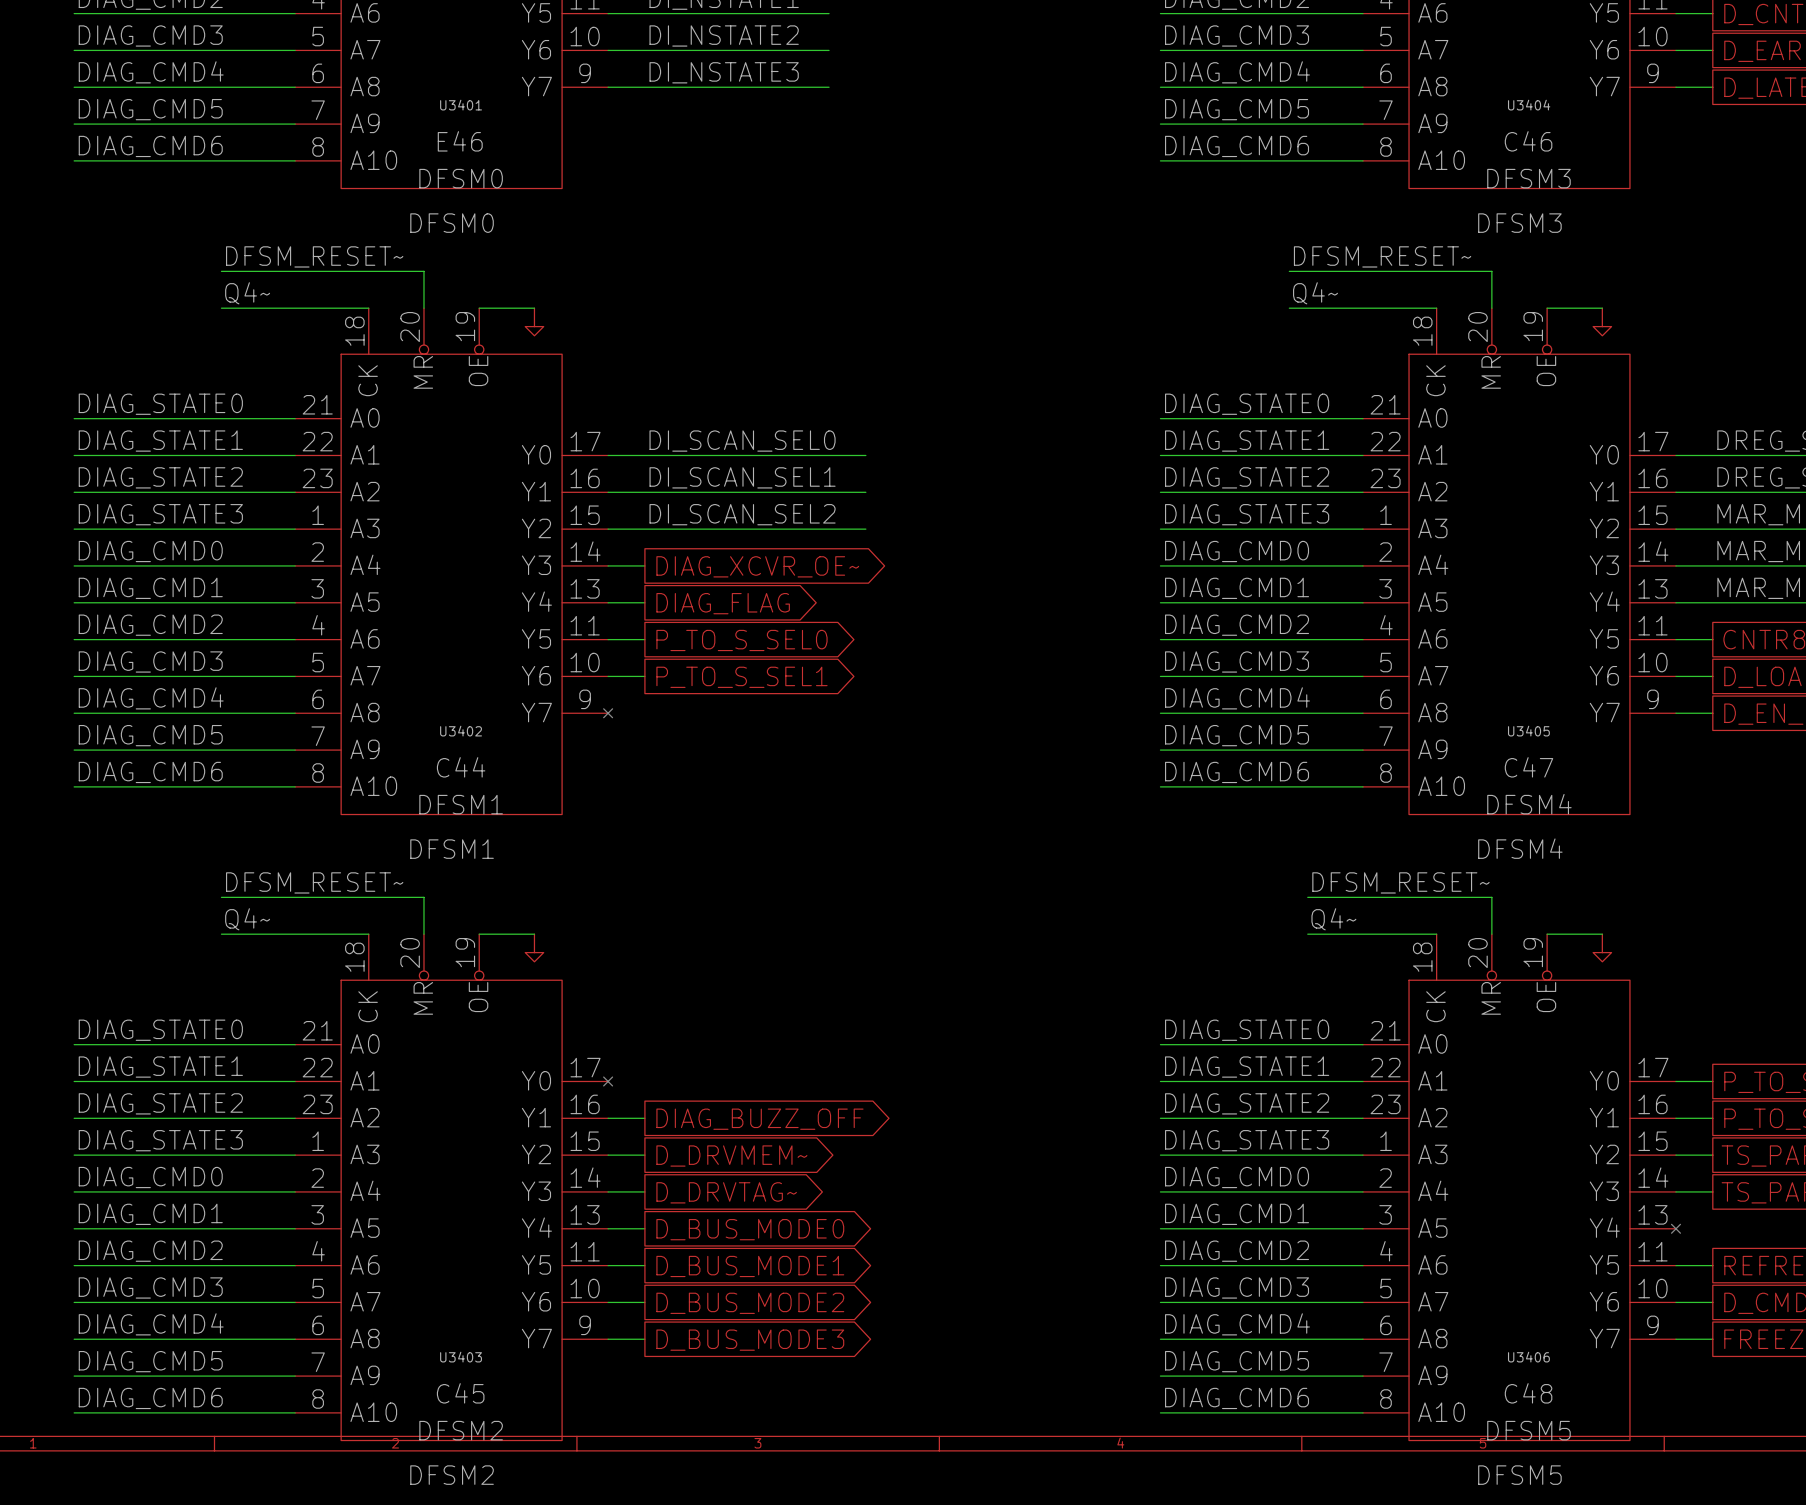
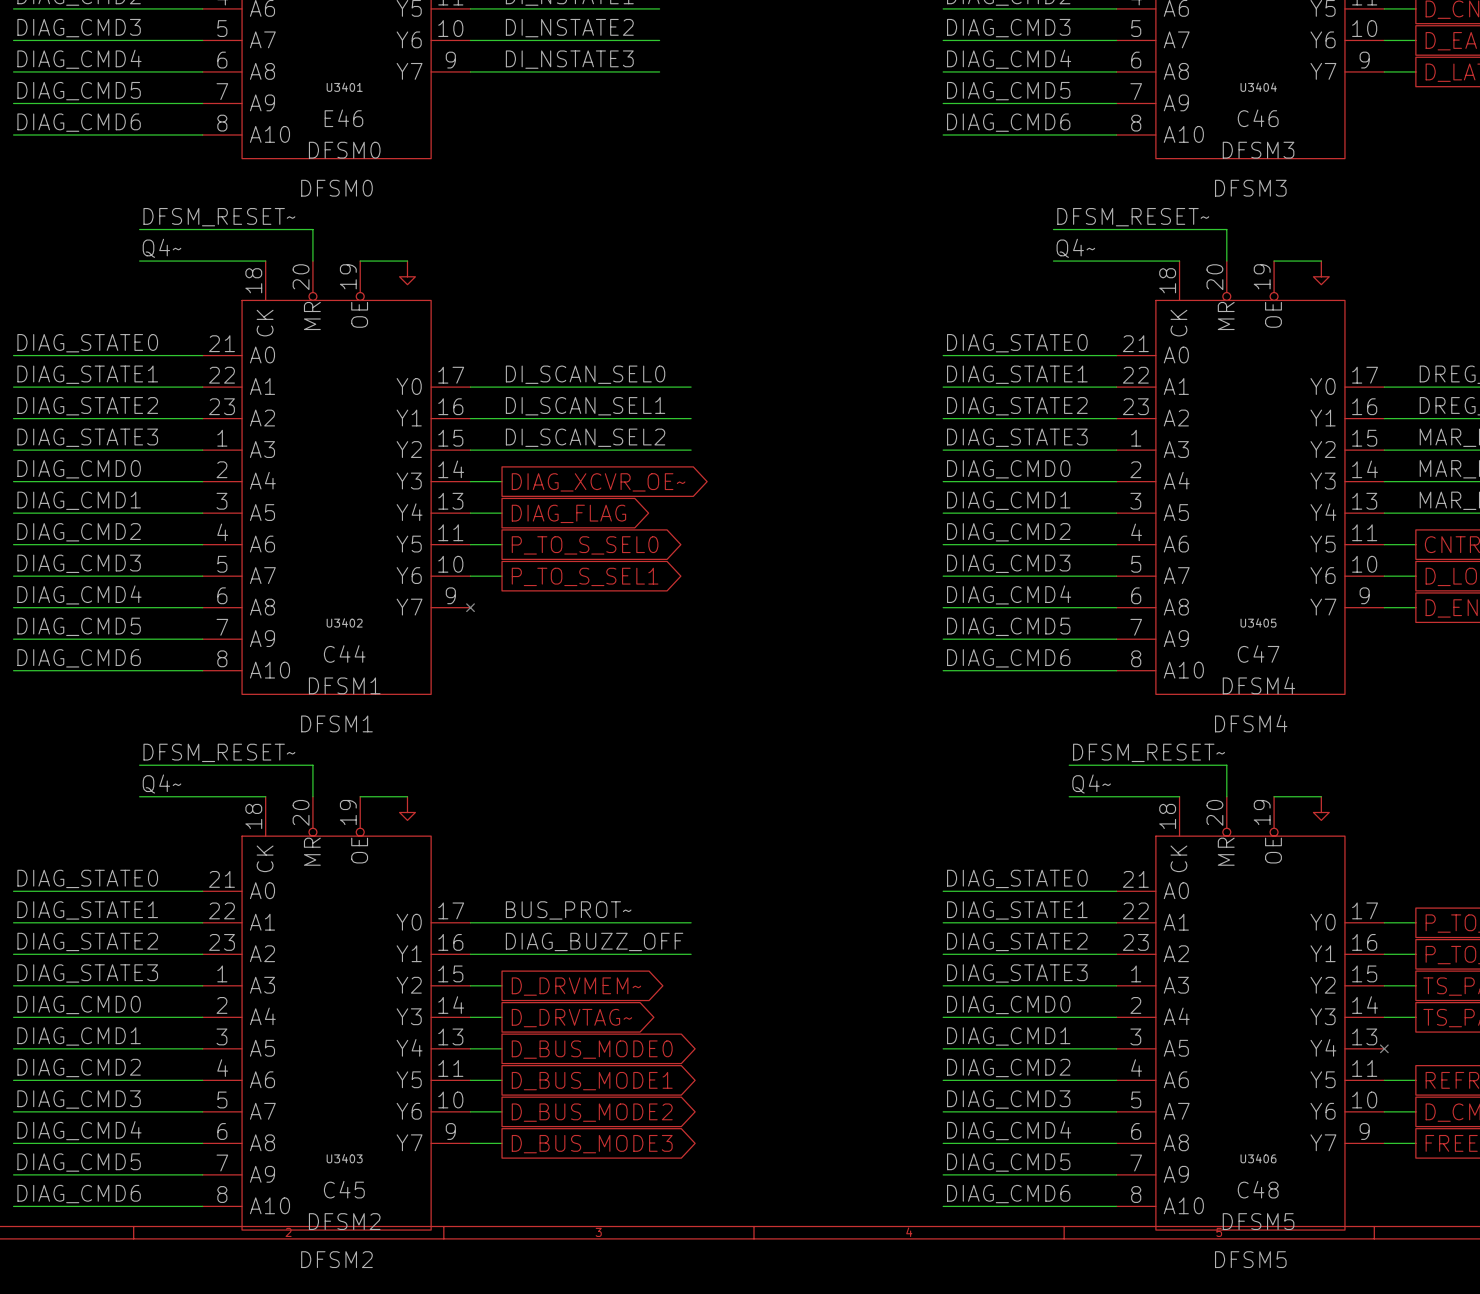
label: none -> BUS_PROT~ (568, 910)
wire: none -> (470, 922) (691, 922)
no-connect mark: (608, 1081) -> none
label: none -> DIAG_BUZZ_OFF (594, 941)
wire: none -> (502, 954) (691, 954)
global label: DIAG_BUZZ_OFF (759, 1119) -> none

